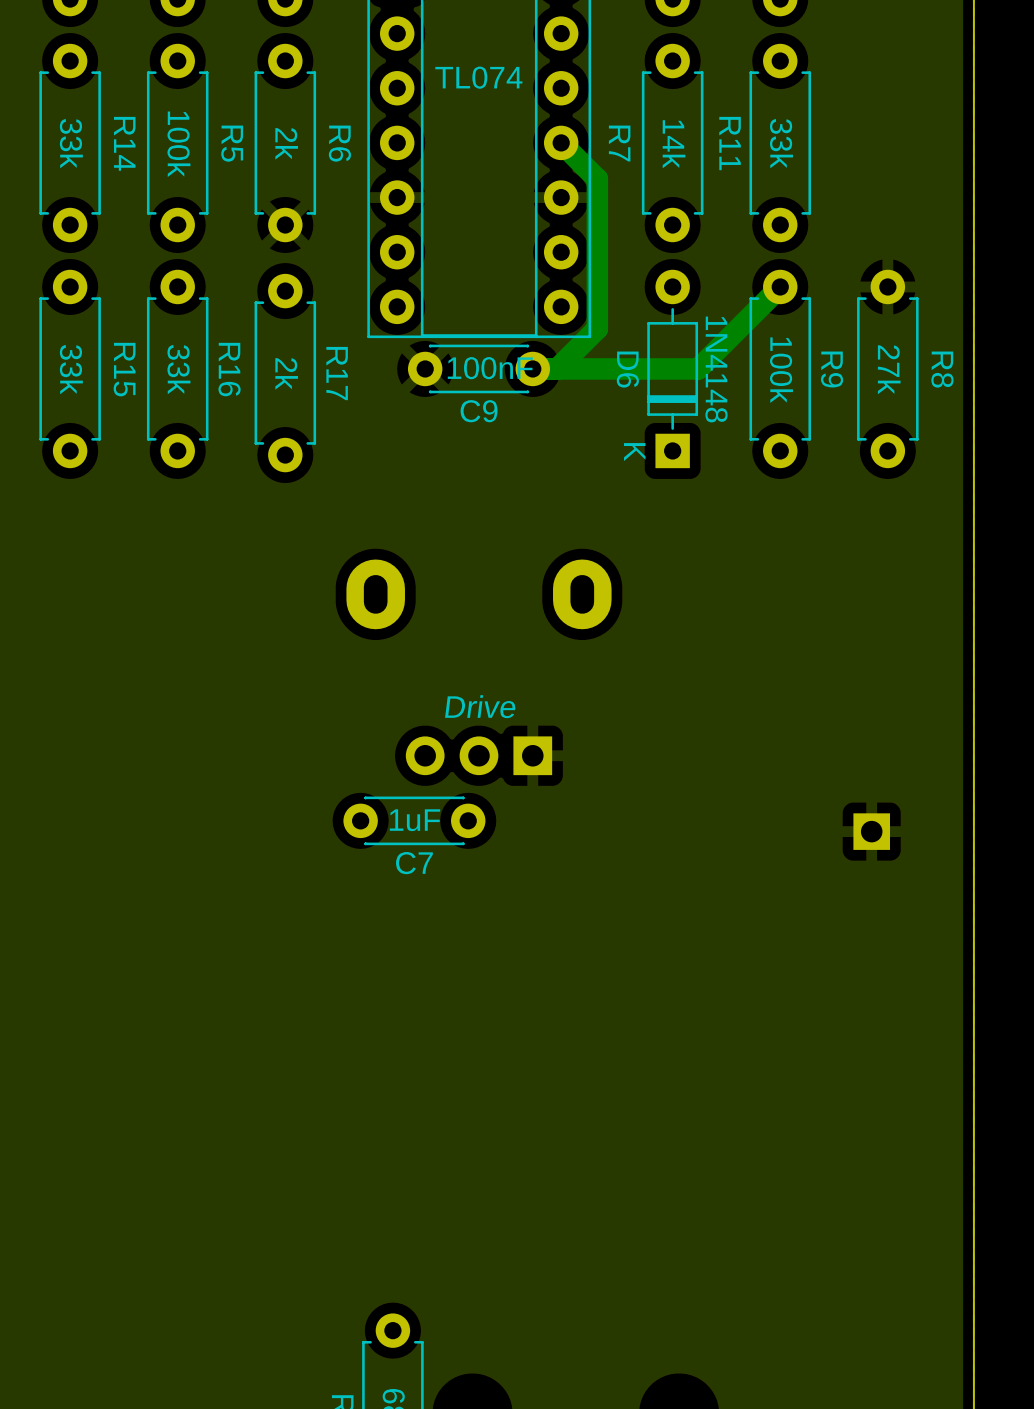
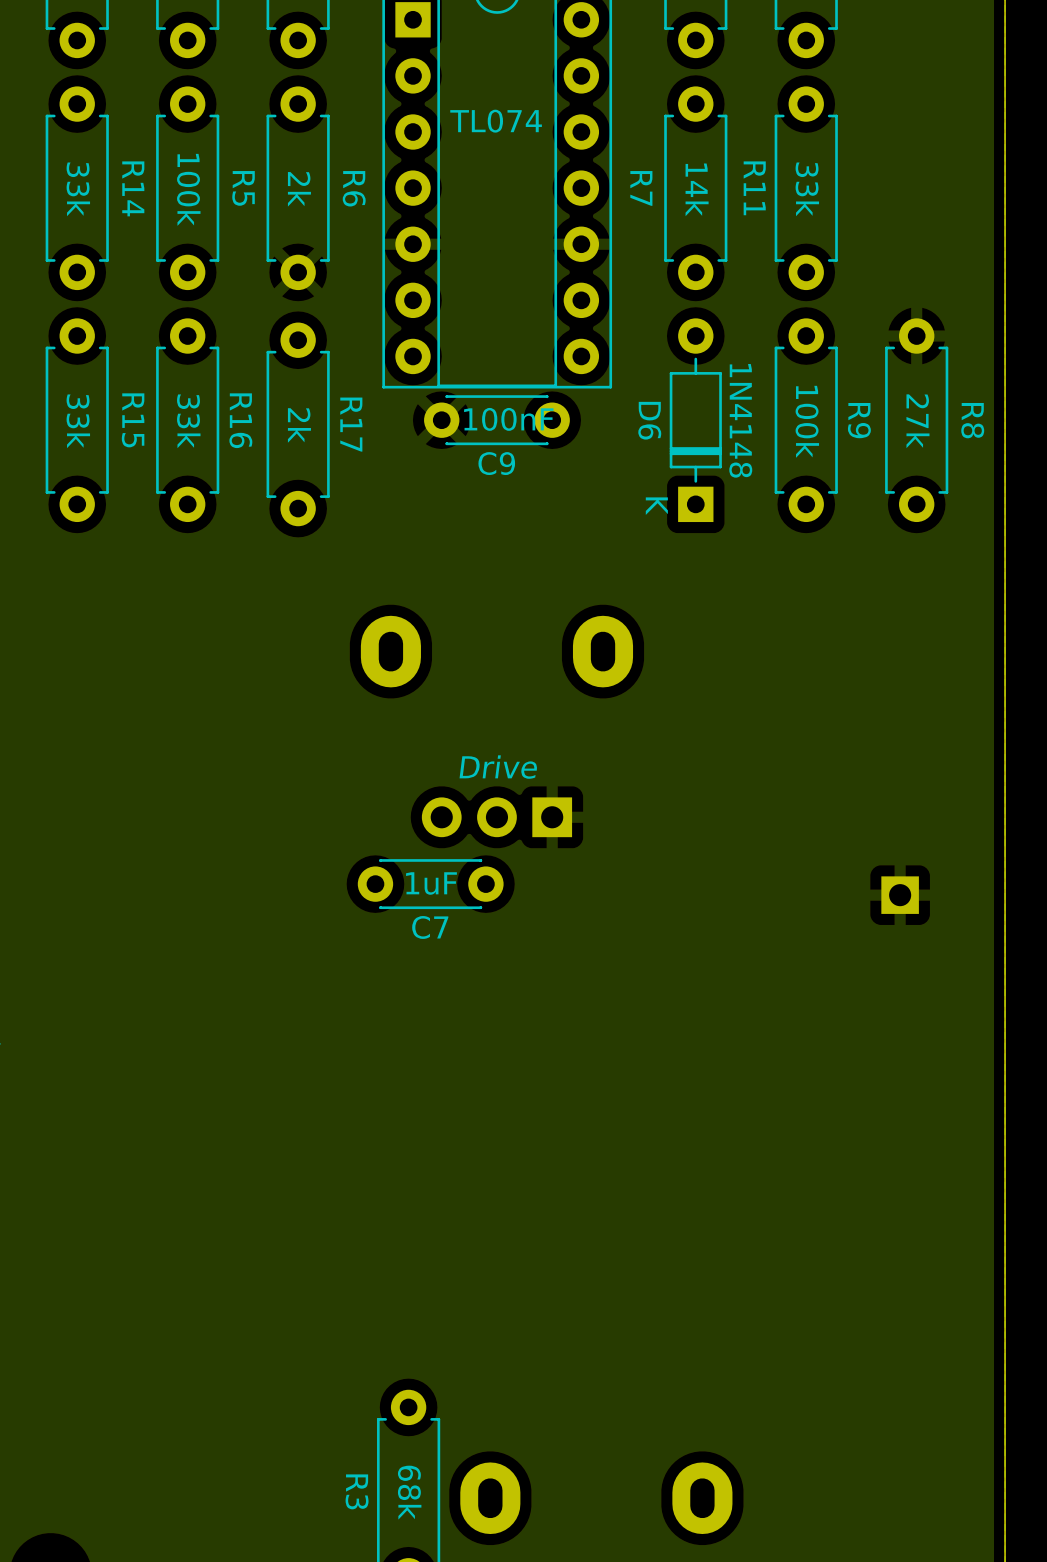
bottom track: (561, 142) (597, 179) (597, 328) (557, 368) -> none
bottom track: (780, 286) (698, 368) (532, 368) -> none

